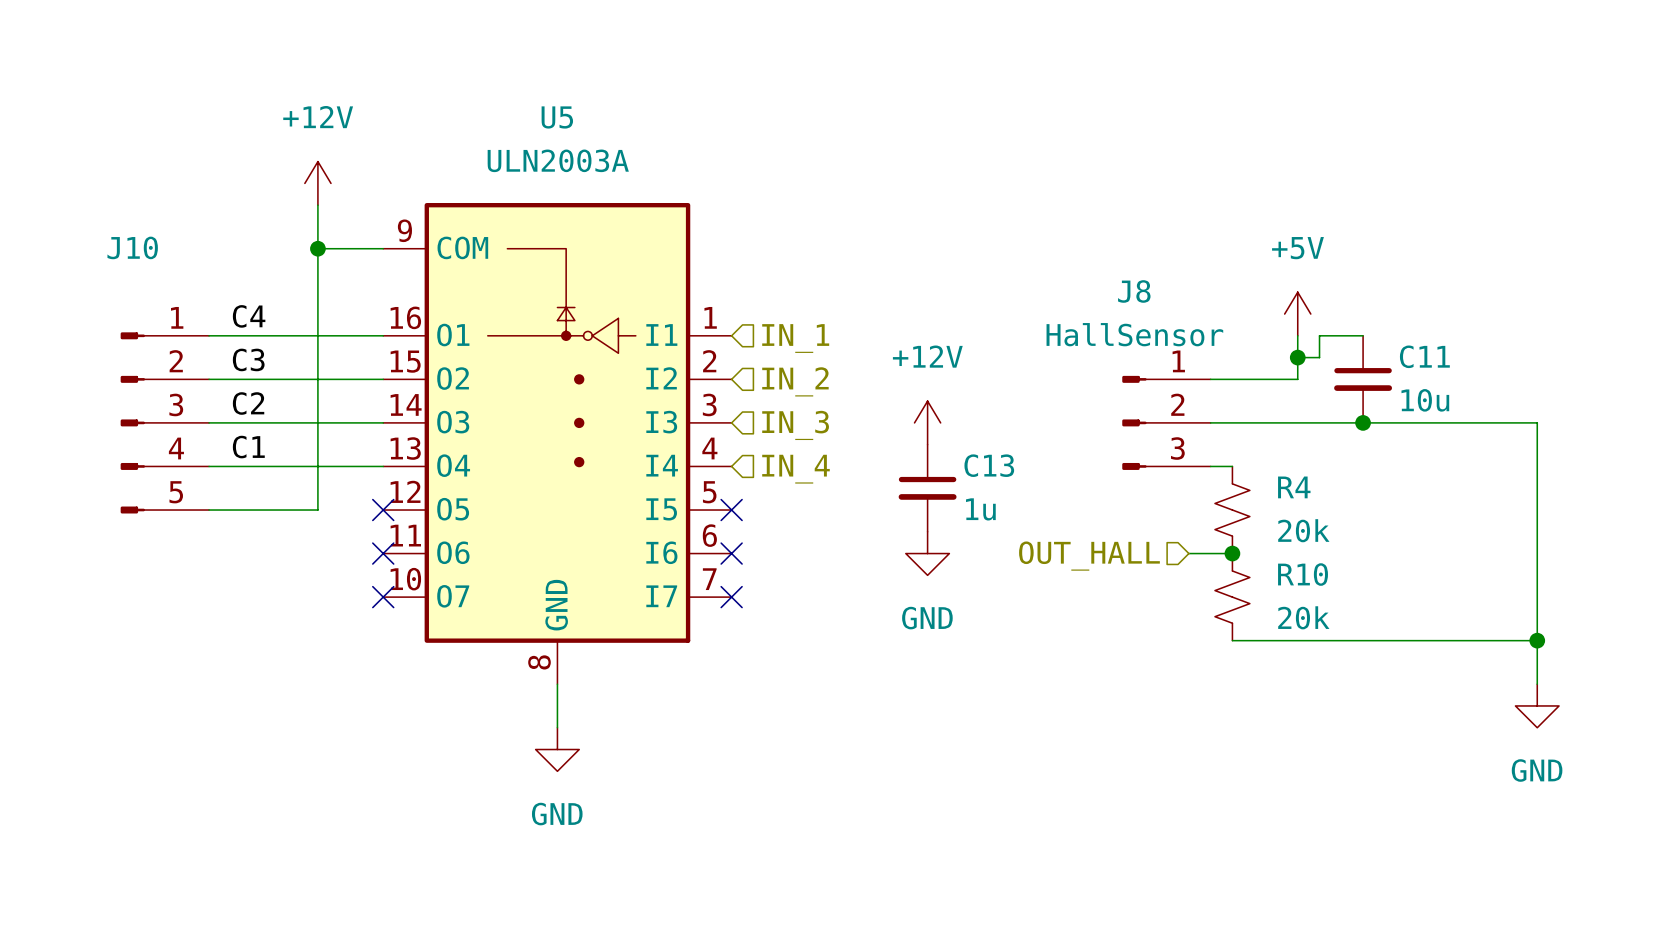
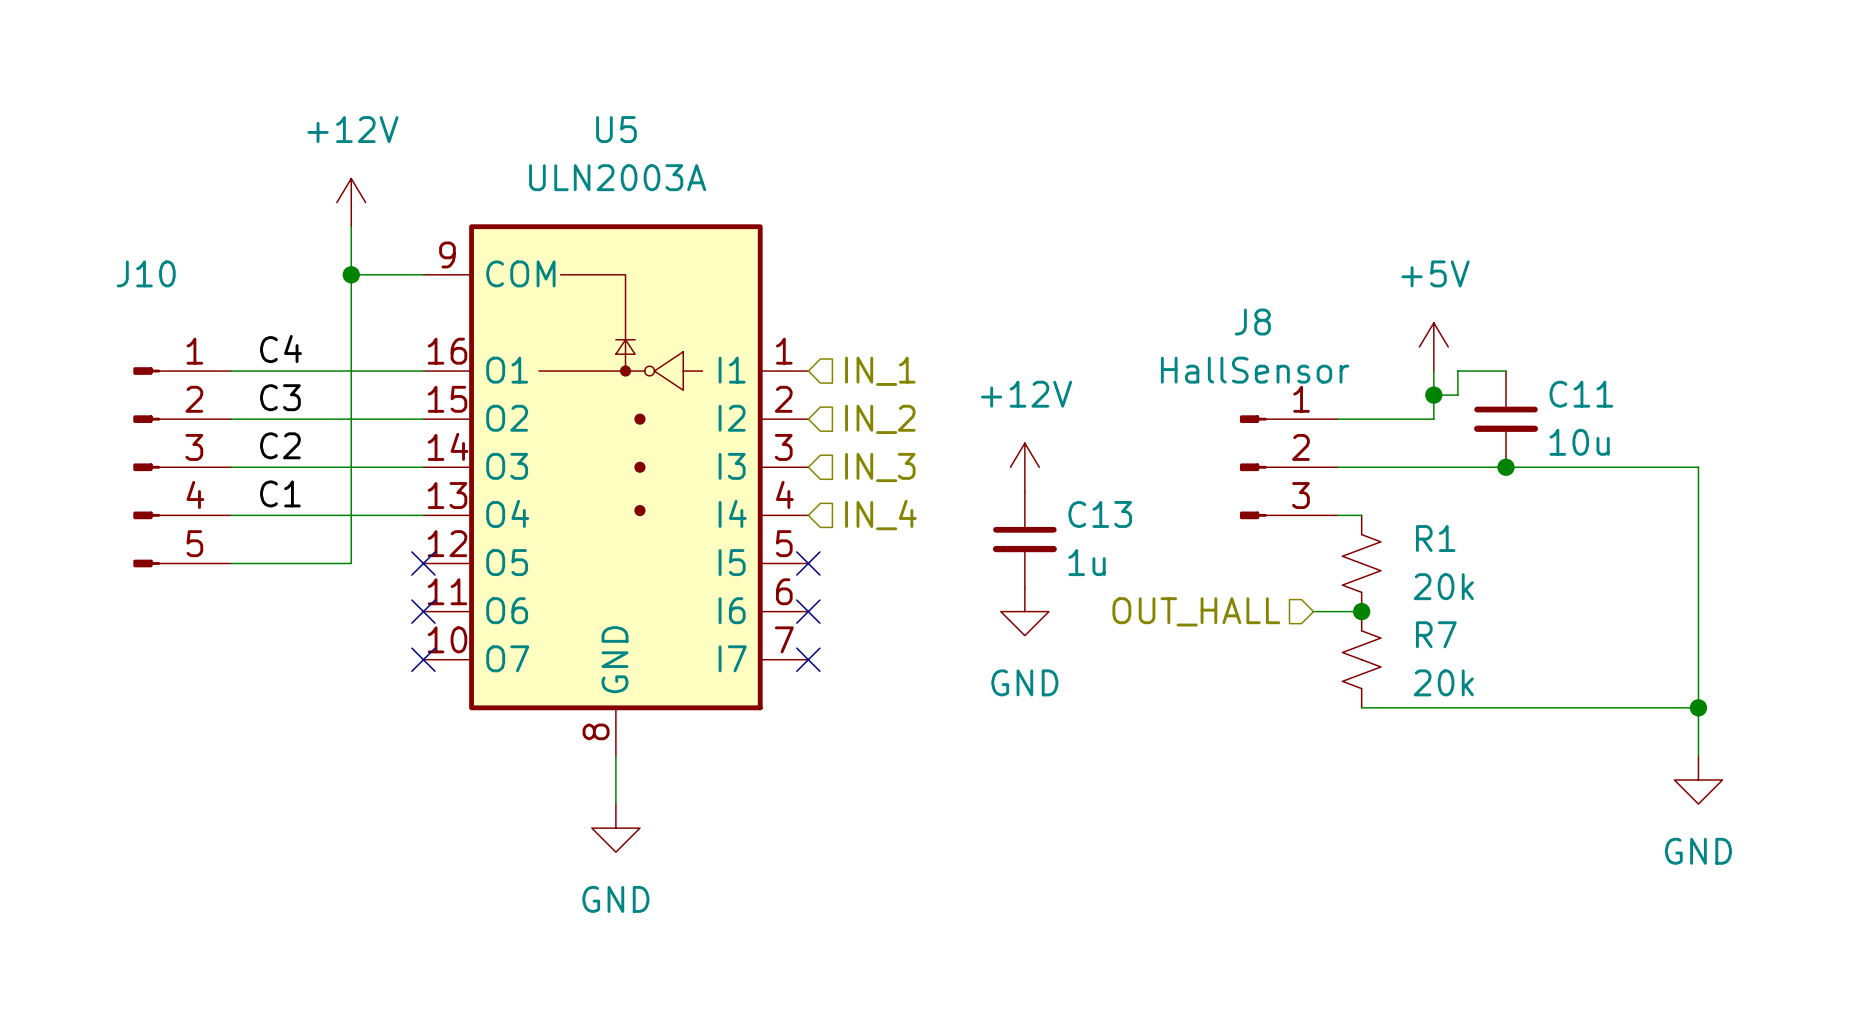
R4 name: R4 (1294, 487) -> R1 (1435, 538)
R10 name: R10 (1303, 574) -> R7 (1436, 634)

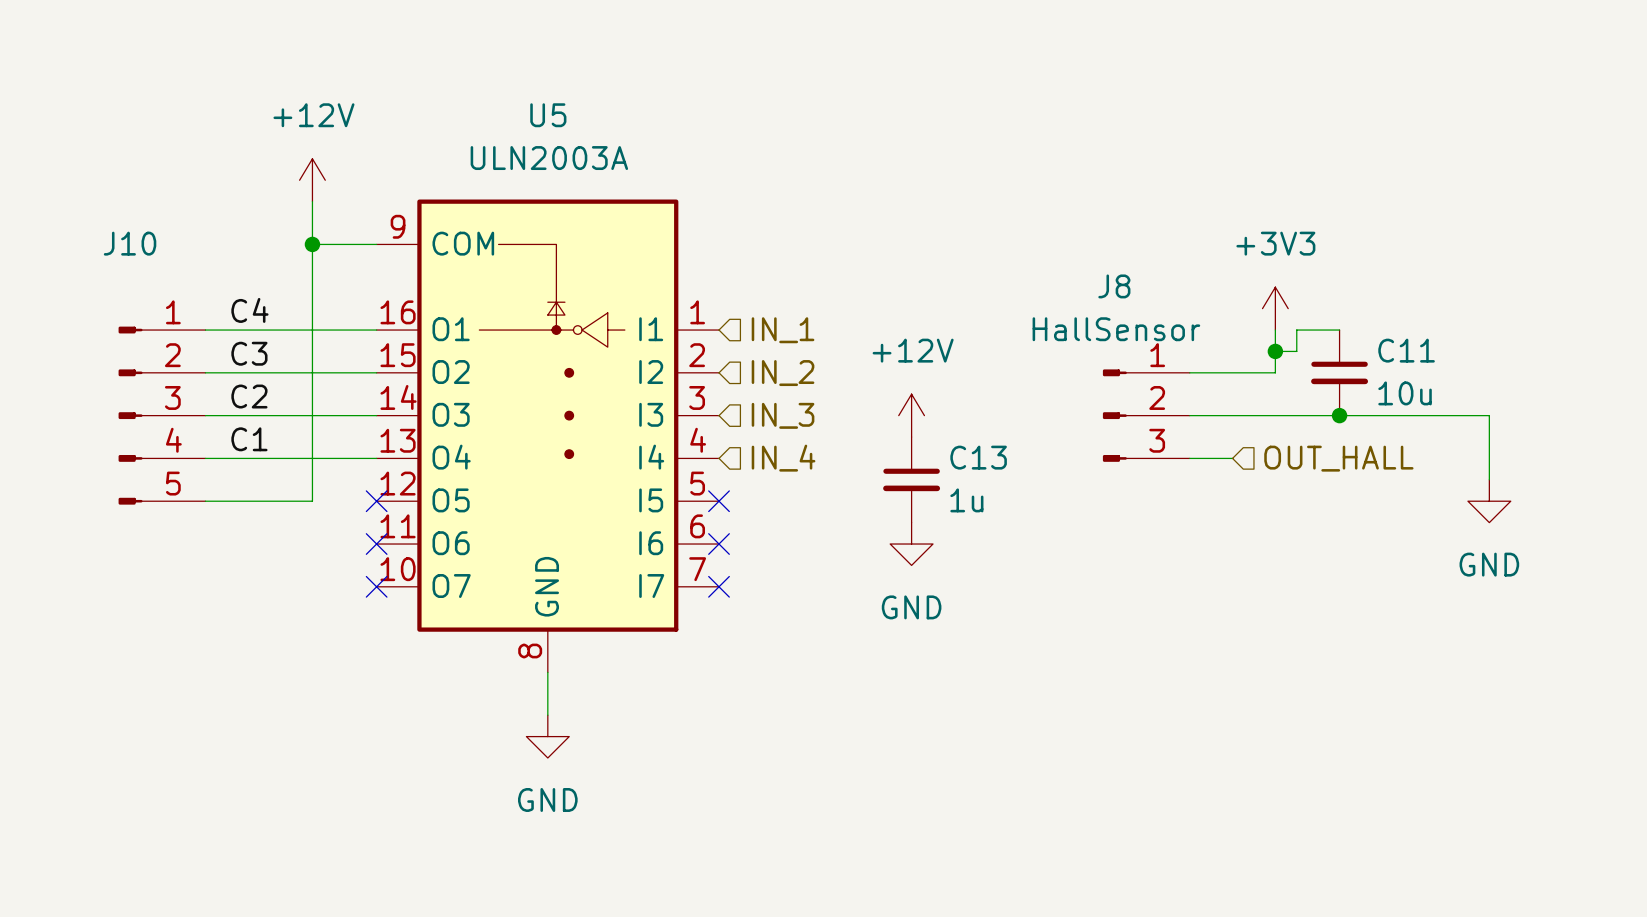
power symbol: +5V (1433, 346) -> +3V3 (1275, 308)
wire: (1674, 467) (1698, 467) (1698, 755) -> (1489, 415) (1489, 479)
wire: none -> (1211, 458) (1232, 458)
R1: 20k (1361, 563) -> none
hierarchical label rotation: 0° (1196, 611) -> 180° (1338, 458)
hierarchical label position: OUT_HALL (1196, 611) -> OUT_HALL (1338, 458)
wire: (1313, 611) (1361, 611) -> none
junction: (1361, 611) -> none
R7: 20k (1361, 659) -> none
wire: (1361, 707) (1698, 707) -> none
junction: (1698, 707) -> none
power symbol position: GND (1698, 780) -> GND (1489, 501)

